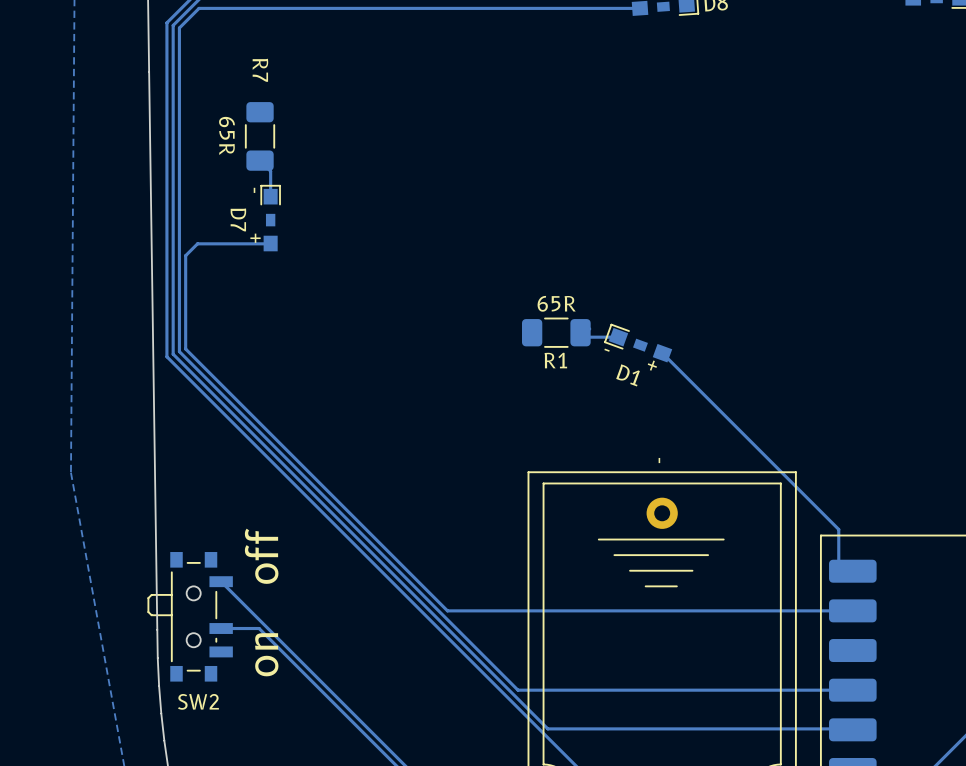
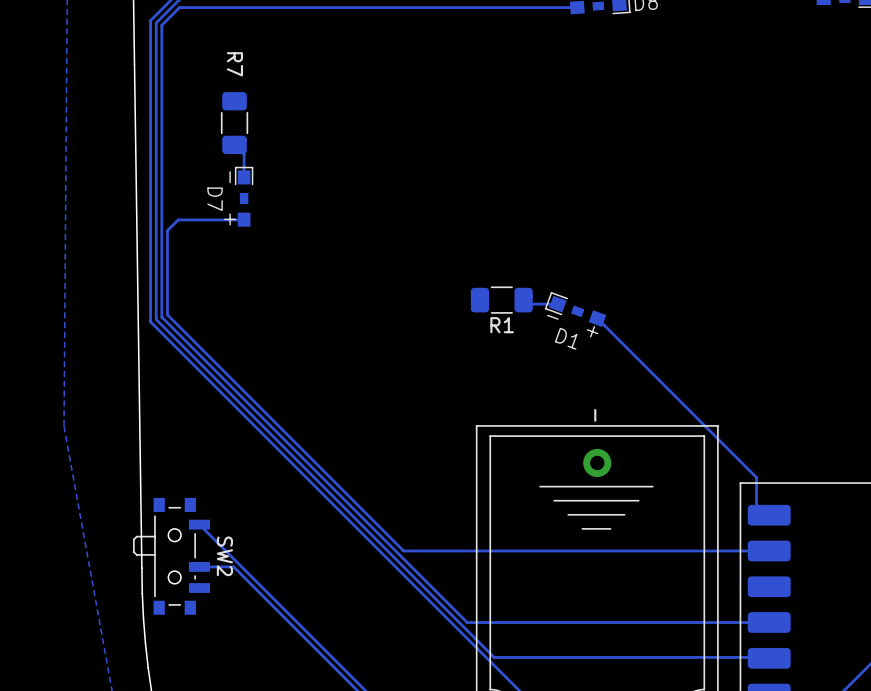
R7 value: 65R (226, 135) -> none
R1 value: 65R (556, 303) -> none
text: on off (261, 602) -> none
SW2 name rotation: 0° (198, 701) -> 90° clockwise (224, 556)
SW2 name position: SW2 (198, 701) -> SW2 (224, 556)

